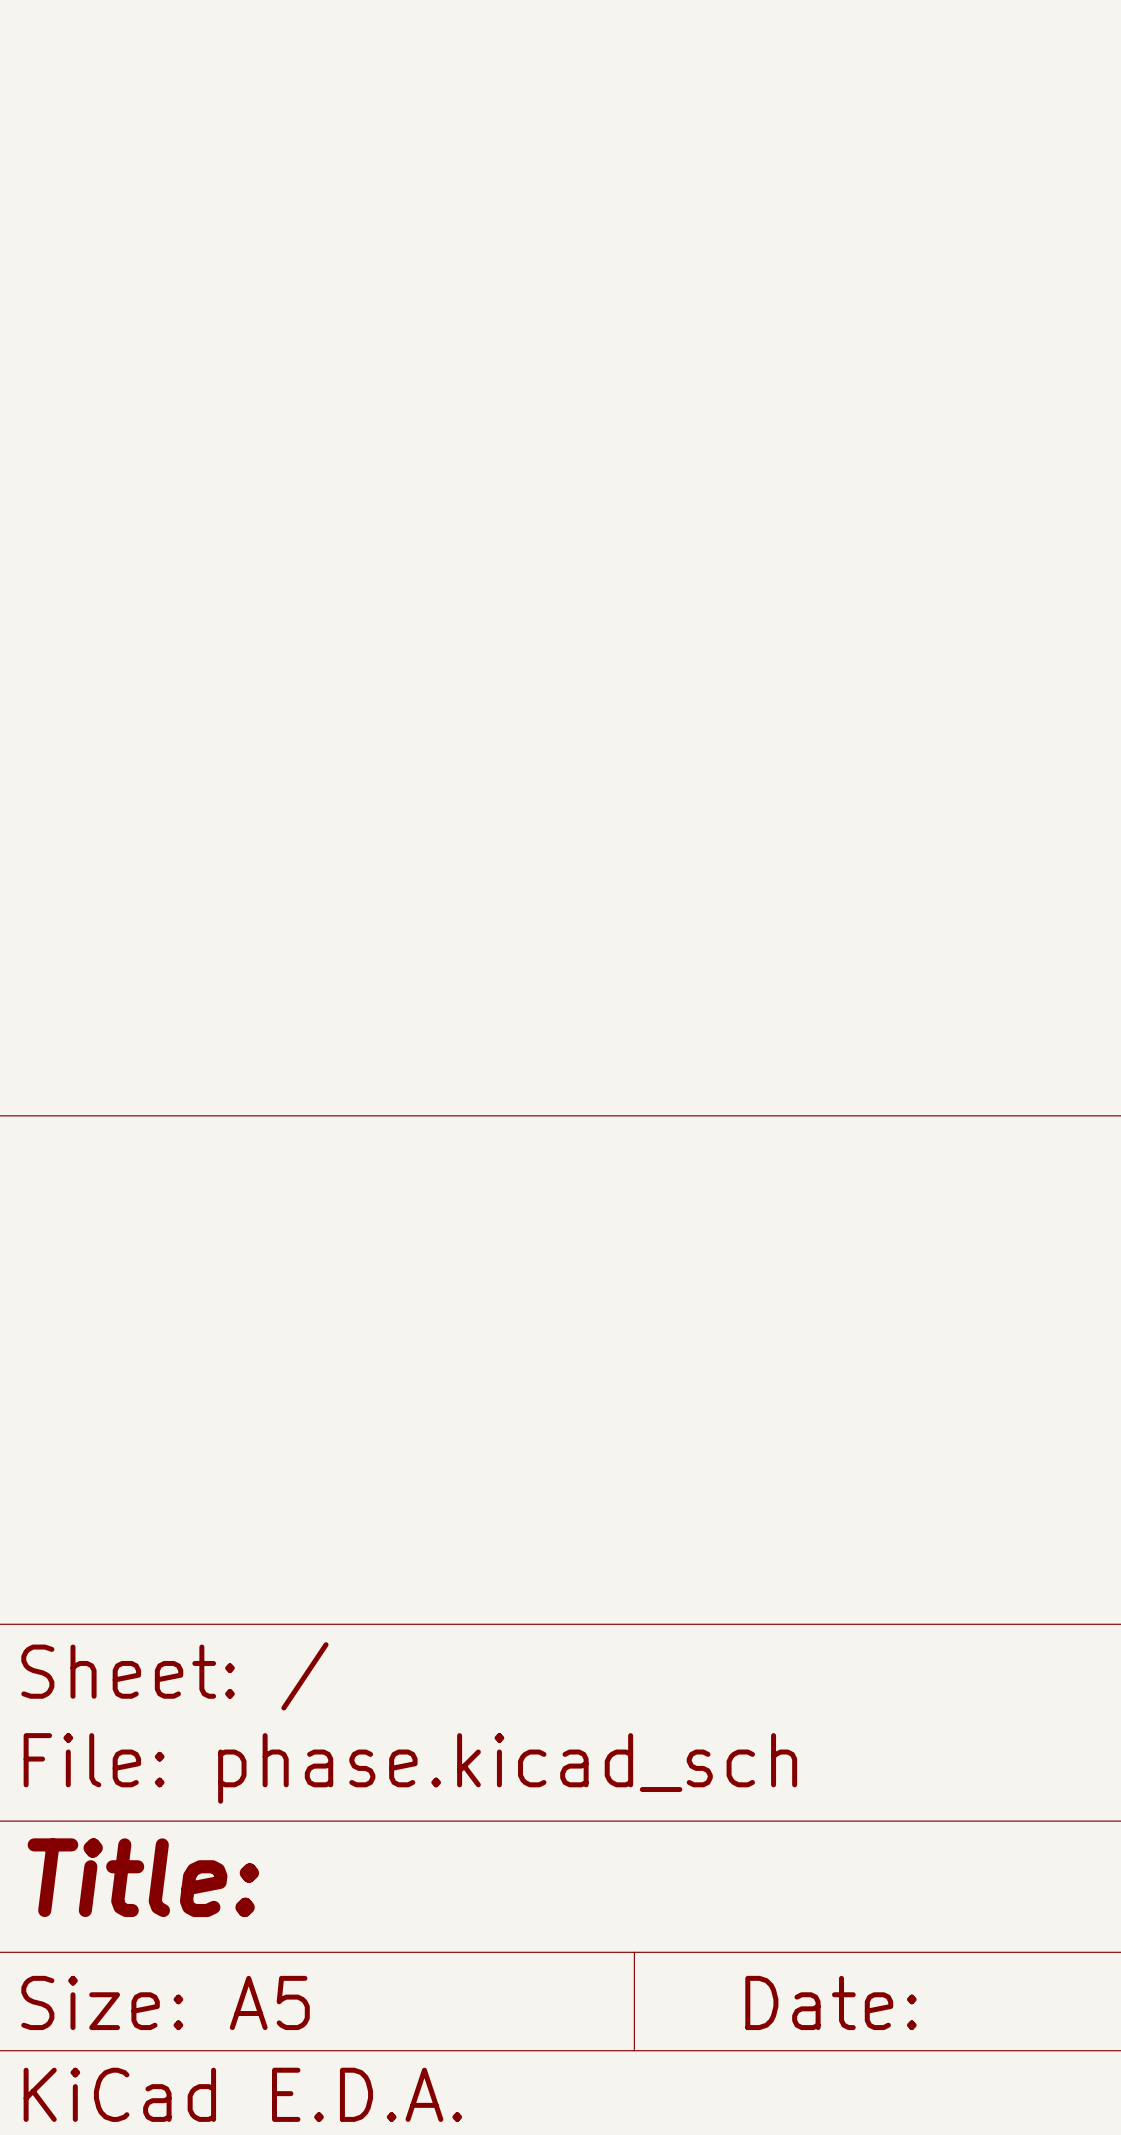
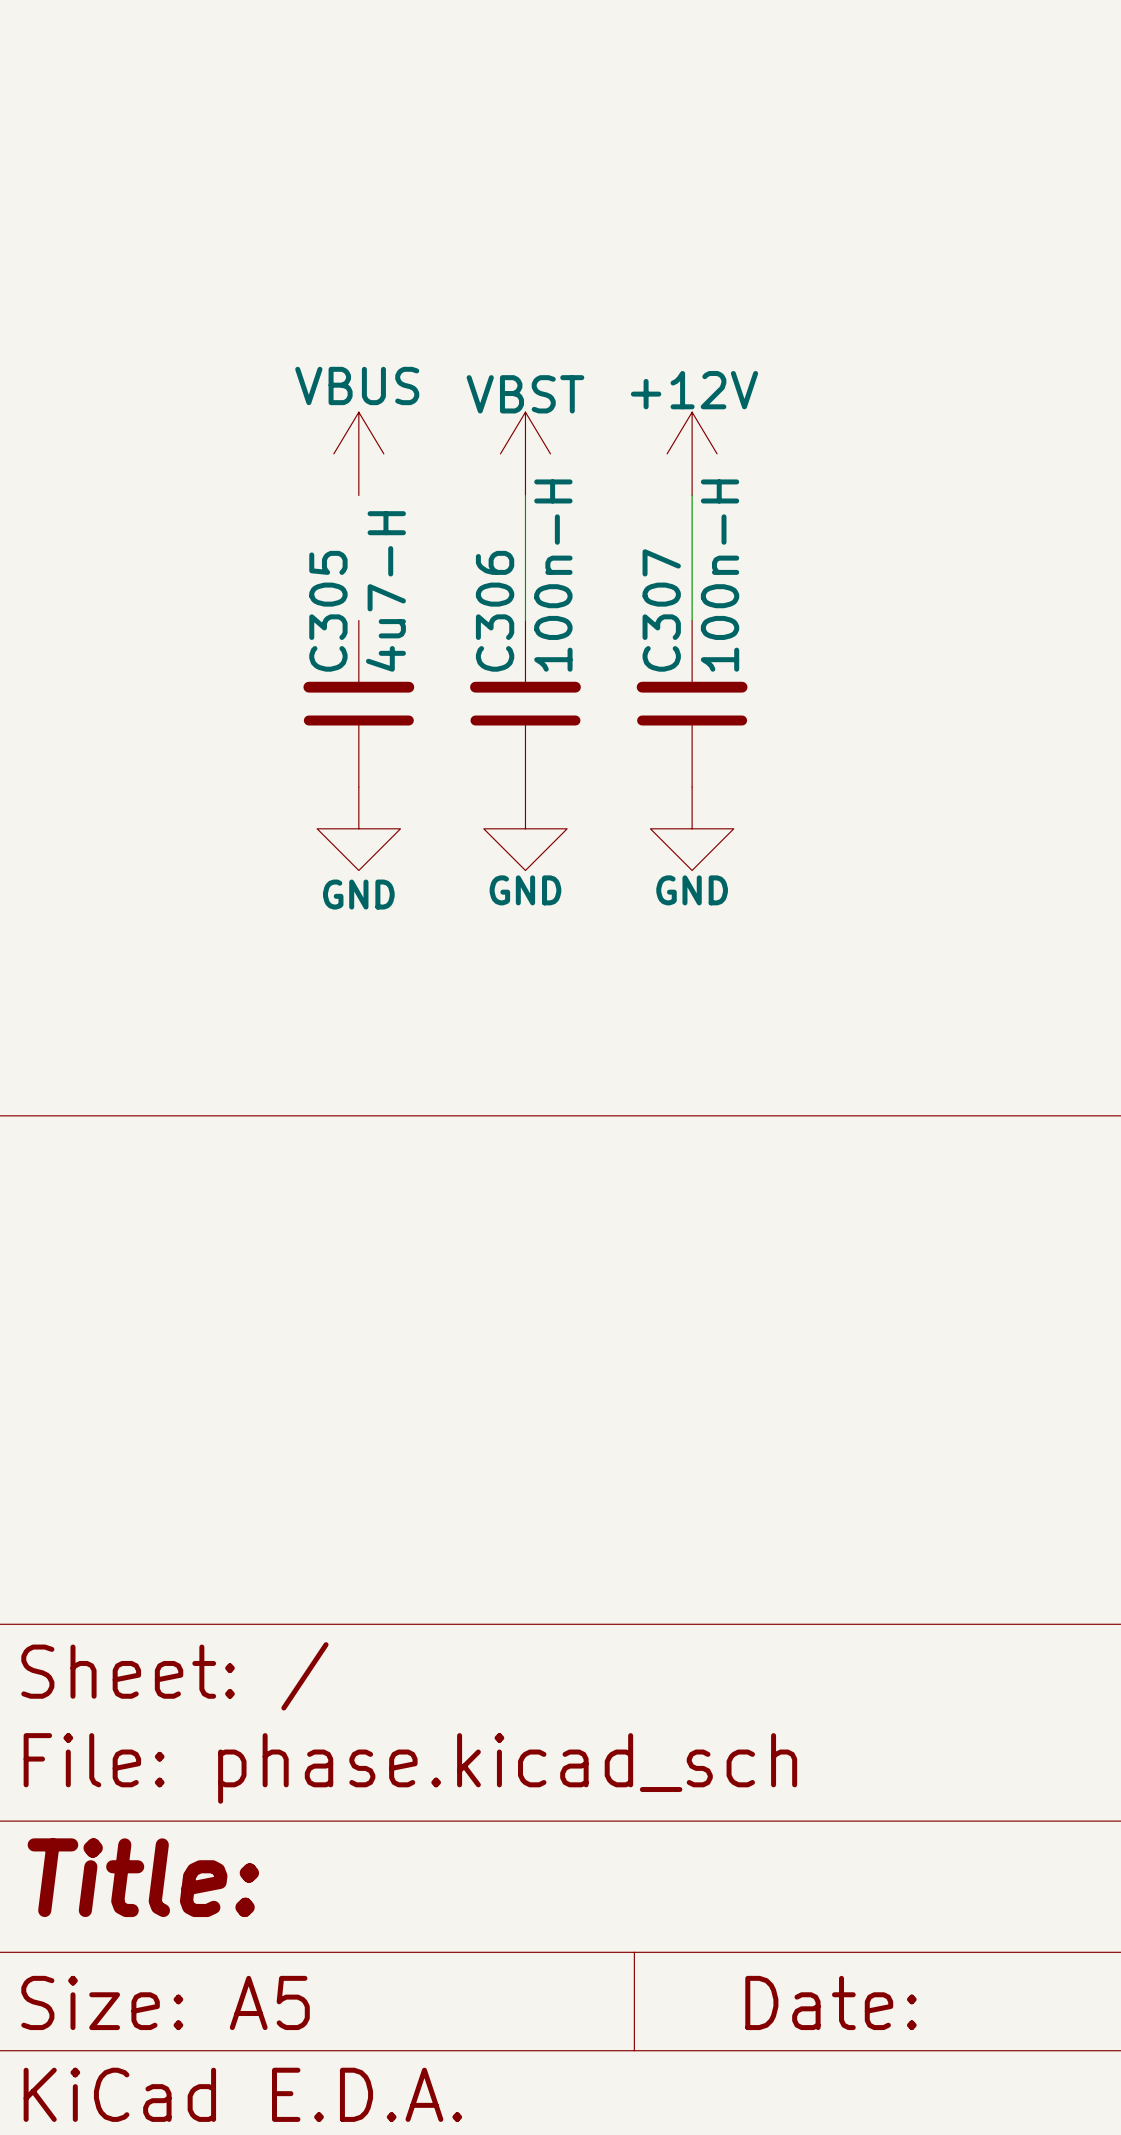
power symbol: none -> VBUS (358, 453)
power symbol: none -> VBST (525, 453)
power symbol: none -> +12V (692, 453)
wire: none -> (525, 495) (525, 620)
wire: none -> (692, 495) (692, 620)
C305: none -> 4u7-H (358, 703)
C306: none -> 100n-H (525, 703)
C307: none -> 100n-H (692, 703)
power symbol: none -> GND (358, 828)
power symbol: none -> GND (525, 828)
power symbol: none -> GND (692, 828)

